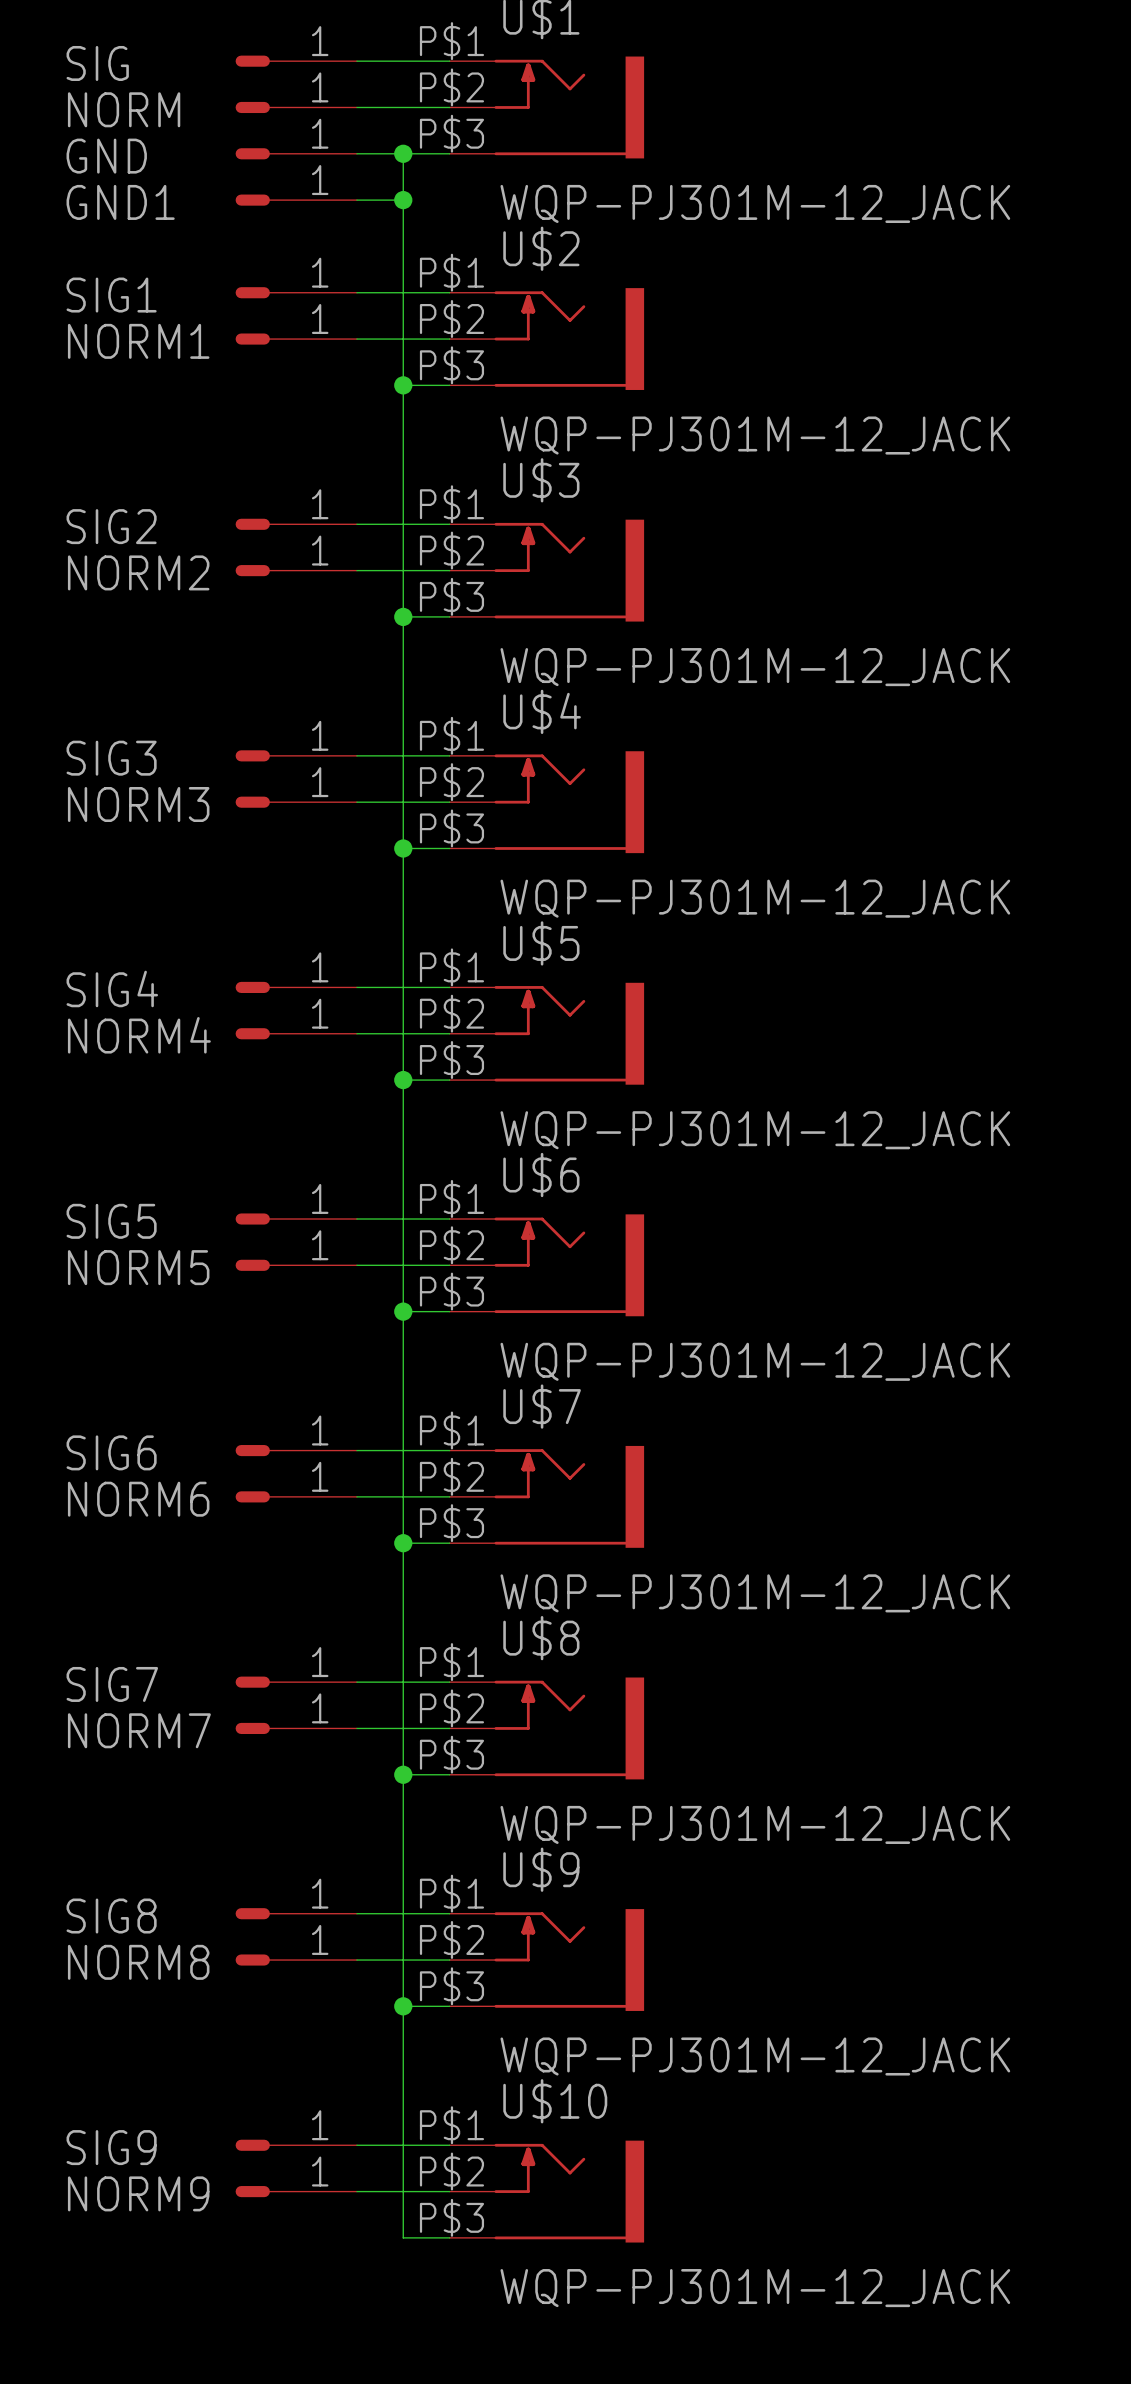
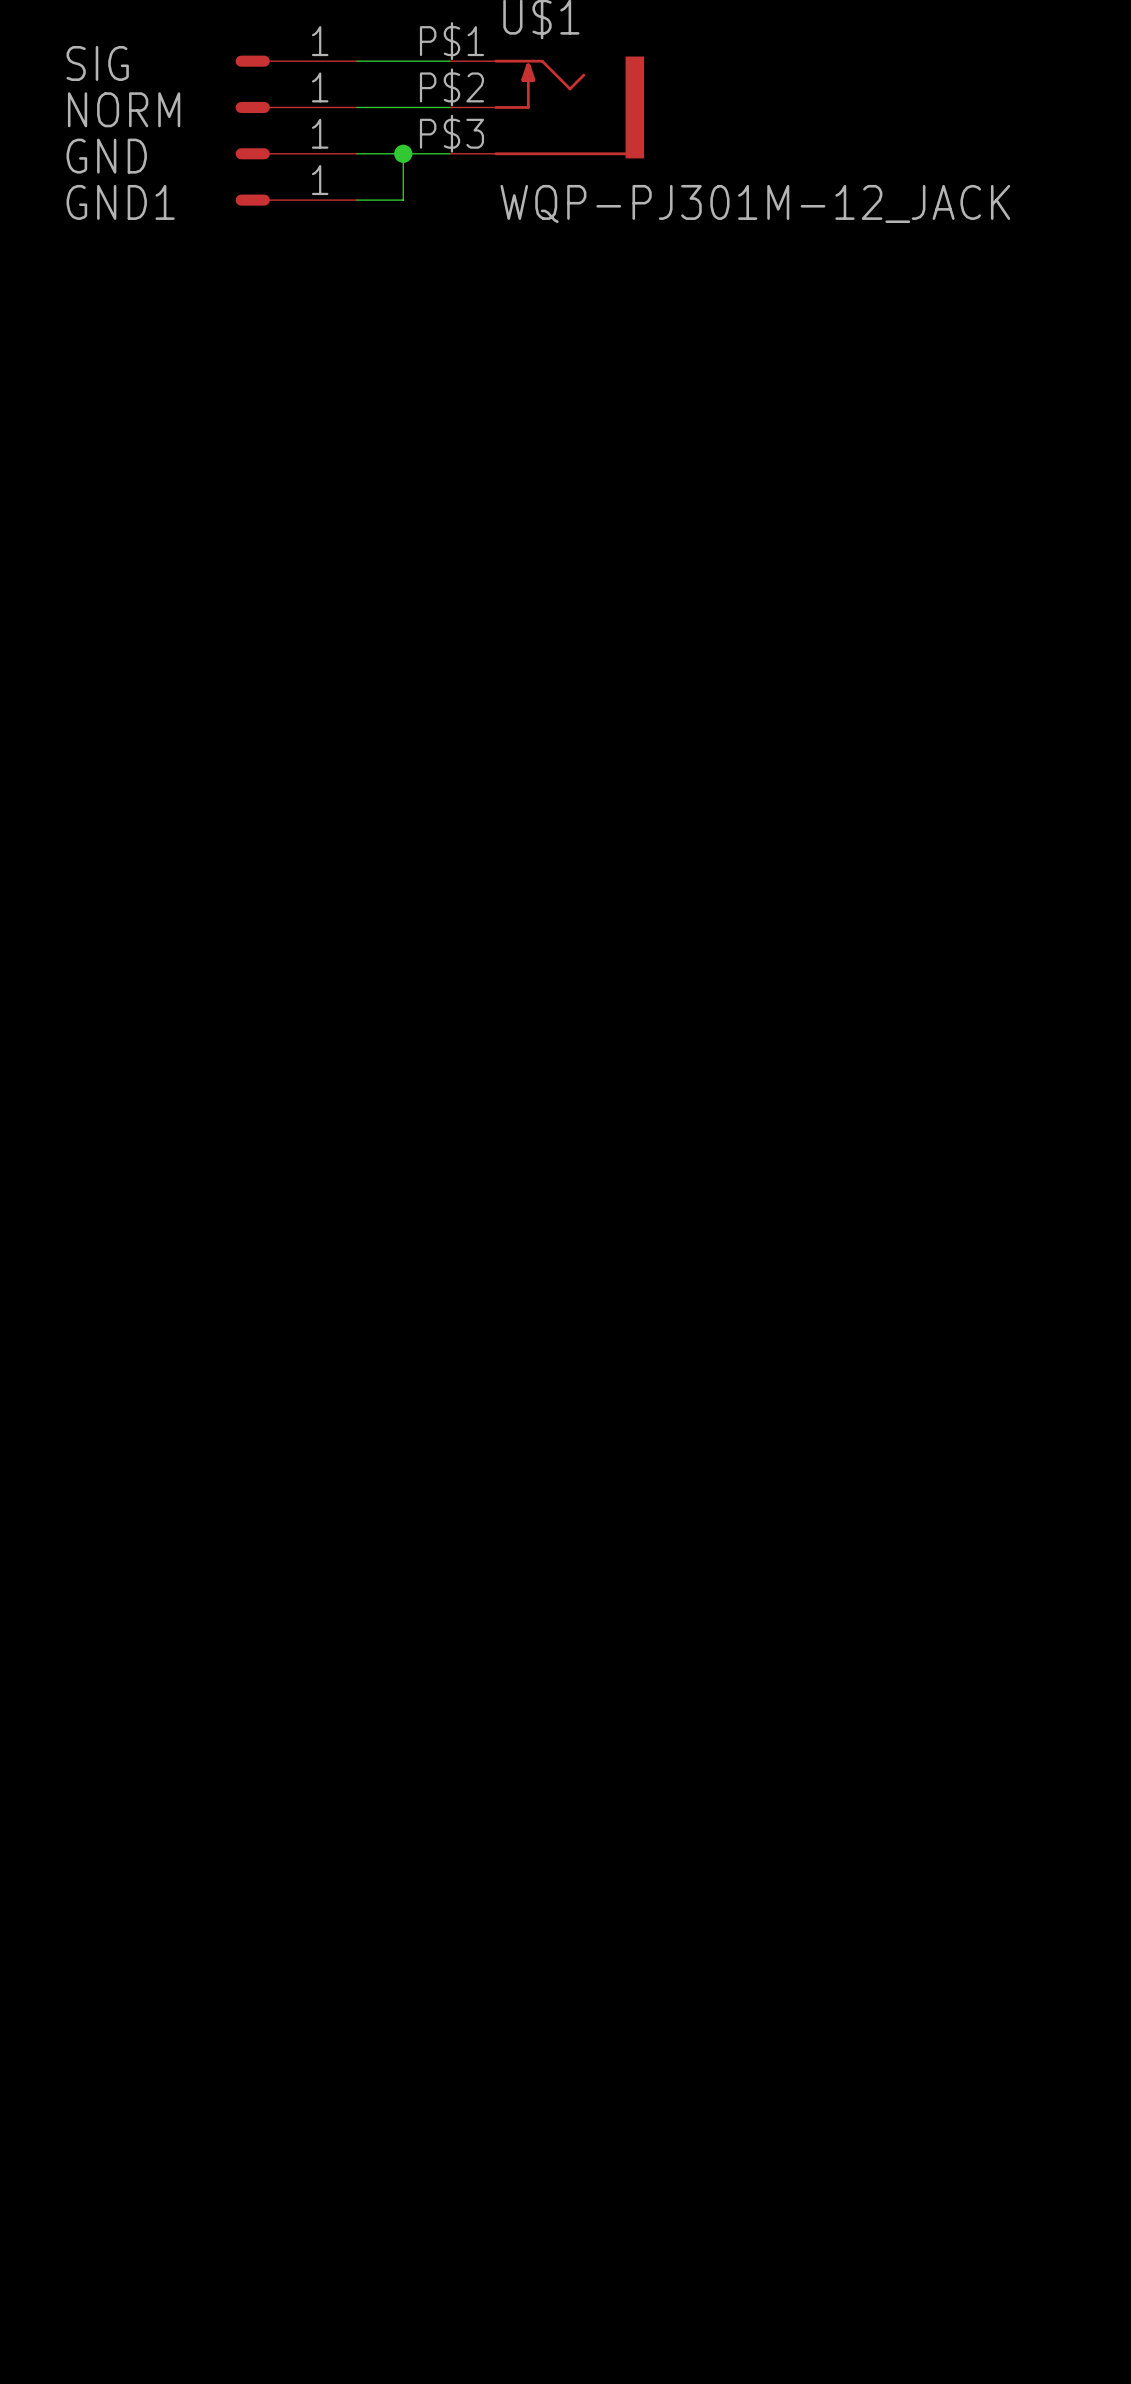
wire: (403, 200) (403, 2237) (449, 2237) -> none
junction: (403, 200) -> none
SIG1: (296, 292) -> none
wire: (356, 292) (449, 292) -> none
NORM1: (296, 339) -> none
wire: (356, 339) (449, 339) -> none
U$2: WQP-PJ301M-12_JACK (546, 339) -> none
wire: (403, 385) (449, 385) -> none
junction: (403, 385) -> none
SIG2: (296, 524) -> none
wire: (356, 524) (449, 524) -> none
NORM2: (296, 570) -> none
wire: (356, 570) (449, 570) -> none
U$3: WQP-PJ301M-12_JACK (546, 570) -> none
wire: (403, 616) (449, 616) -> none
junction: (403, 616) -> none
SIG3: (296, 755) -> none
wire: (356, 755) (449, 755) -> none
NORM3: (296, 802) -> none
wire: (356, 802) (449, 802) -> none
U$4: WQP-PJ301M-12_JACK (546, 802) -> none
wire: (403, 848) (449, 848) -> none
junction: (403, 848) -> none
SIG4: (296, 987) -> none
wire: (356, 987) (449, 987) -> none
NORM4: (296, 1033) -> none
wire: (356, 1033) (449, 1033) -> none
U$5: WQP-PJ301M-12_JACK (546, 1033) -> none
wire: (403, 1080) (449, 1080) -> none
junction: (403, 1080) -> none
SIG5: (296, 1219) -> none
wire: (356, 1219) (449, 1219) -> none
NORM5: (296, 1265) -> none
wire: (356, 1265) (449, 1265) -> none
U$6: WQP-PJ301M-12_JACK (546, 1265) -> none
wire: (403, 1311) (449, 1311) -> none
junction: (403, 1311) -> none
SIG6: (296, 1450) -> none
wire: (356, 1450) (449, 1450) -> none
NORM6: (296, 1496) -> none
wire: (356, 1496) (449, 1496) -> none
U$7: WQP-PJ301M-12_JACK (546, 1496) -> none
wire: (403, 1543) (449, 1543) -> none
junction: (403, 1543) -> none
SIG7: (296, 1682) -> none
wire: (356, 1682) (449, 1682) -> none
NORM7: (296, 1728) -> none
wire: (356, 1728) (449, 1728) -> none
U$8: WQP-PJ301M-12_JACK (546, 1728) -> none
wire: (403, 1774) (449, 1774) -> none
junction: (403, 1774) -> none
SIG8: (296, 1913) -> none
wire: (356, 1913) (449, 1913) -> none
NORM8: (296, 1960) -> none
wire: (356, 1960) (449, 1960) -> none
U$9: WQP-PJ301M-12_JACK (546, 1960) -> none
wire: (403, 2006) (449, 2006) -> none
junction: (403, 2006) -> none
SIG9: (296, 2145) -> none
wire: (356, 2145) (449, 2145) -> none
NORM9: (296, 2191) -> none
wire: (356, 2191) (449, 2191) -> none
U$10: WQP-PJ301M-12_JACK (546, 2191) -> none

